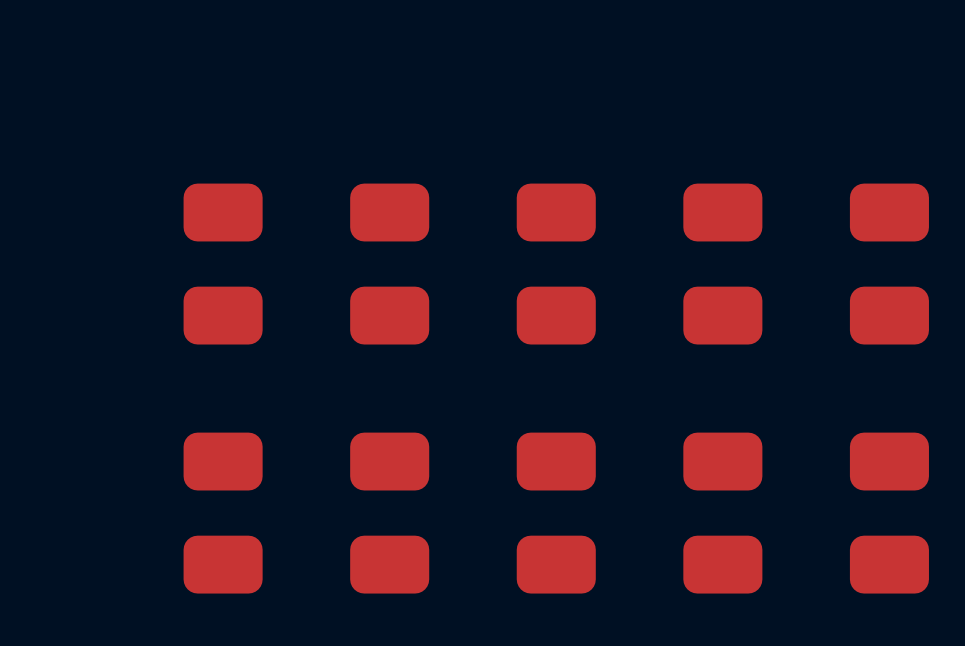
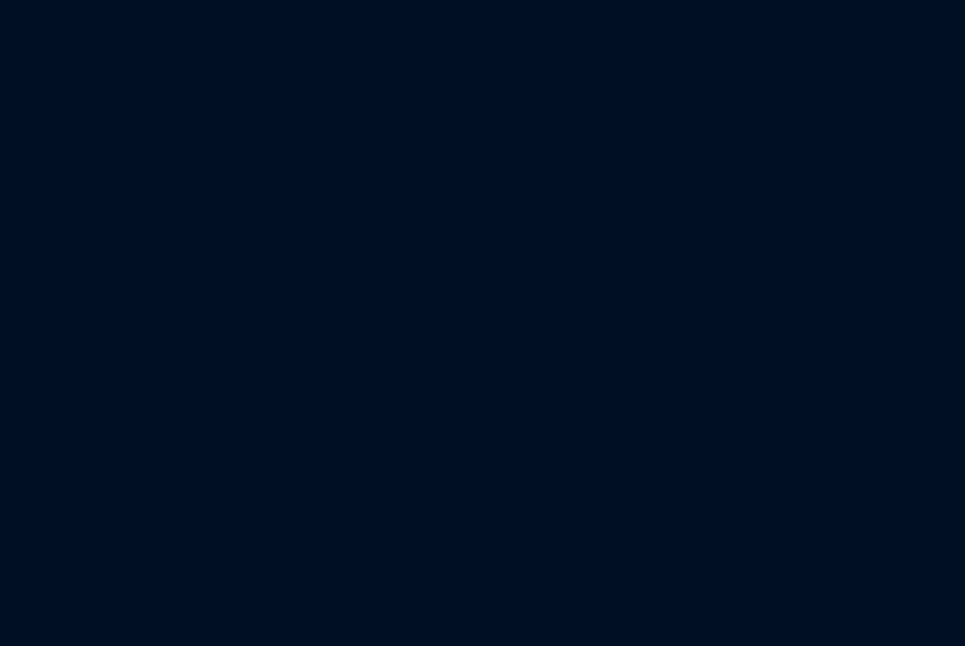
part: (223, 264) -> none
part: (389, 264) -> none
part: (556, 264) -> none
part: (722, 264) -> none
part: (889, 264) -> none
part: (223, 513) -> none
part: (389, 513) -> none
part: (556, 513) -> none
part: (722, 513) -> none
part: (889, 513) -> none

